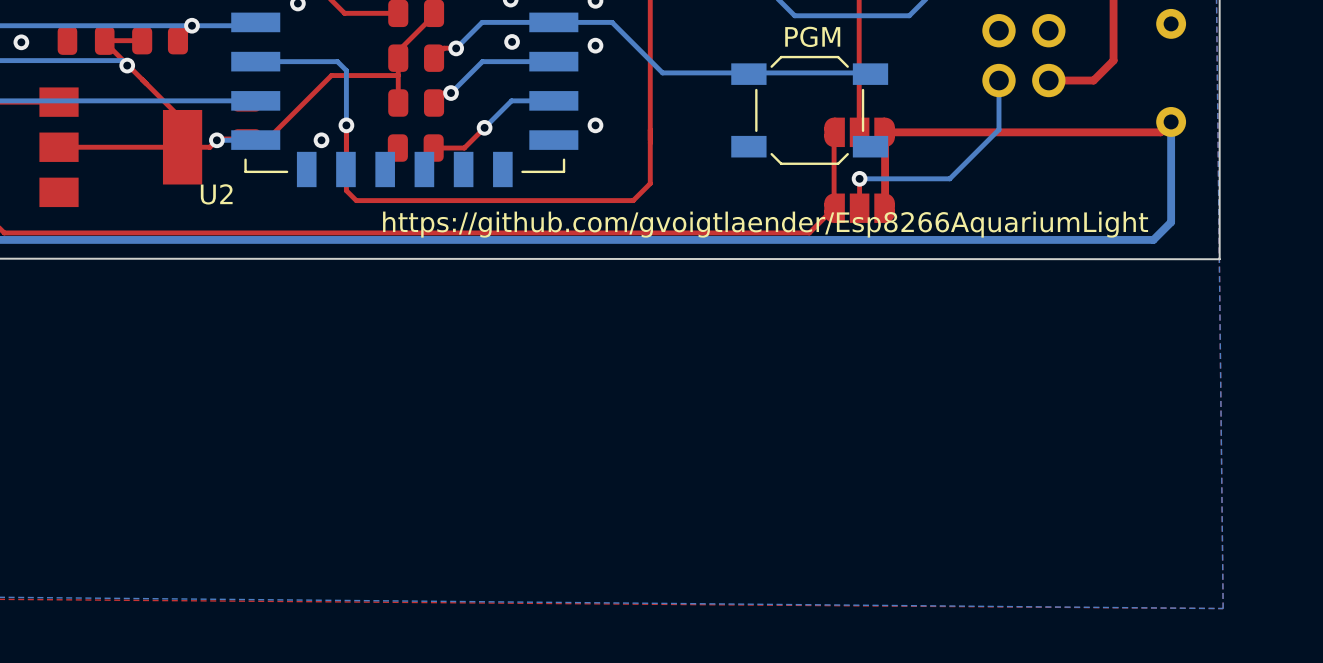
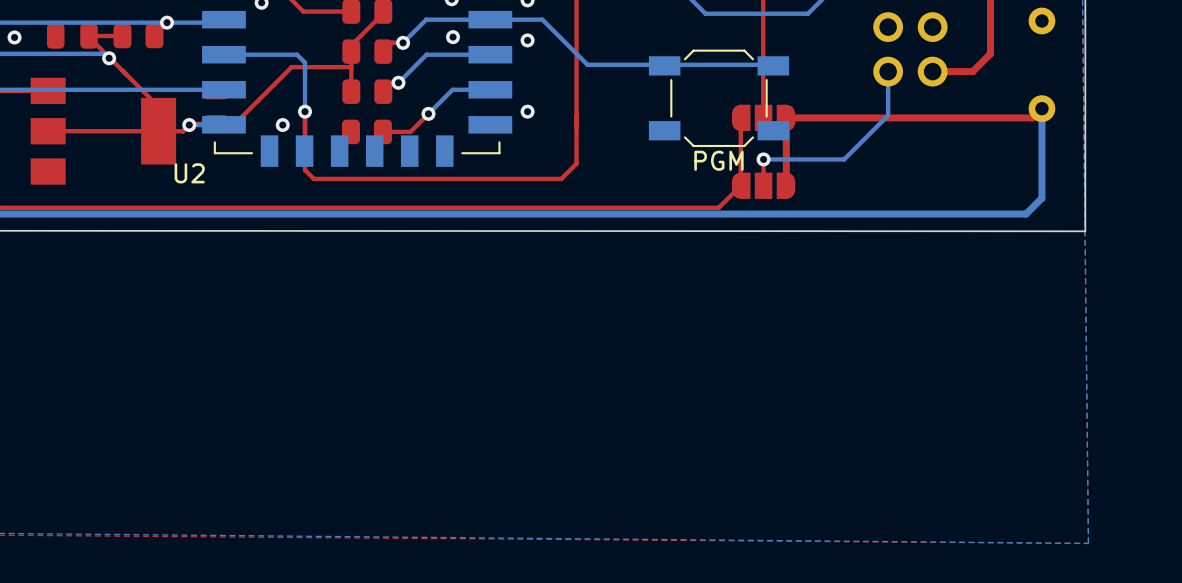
part value position: PGM (812, 36) -> PGM (718, 160)
text: https://github.com/gvoigtlaender/Esp8266AquariumLight (765, 224) -> none

